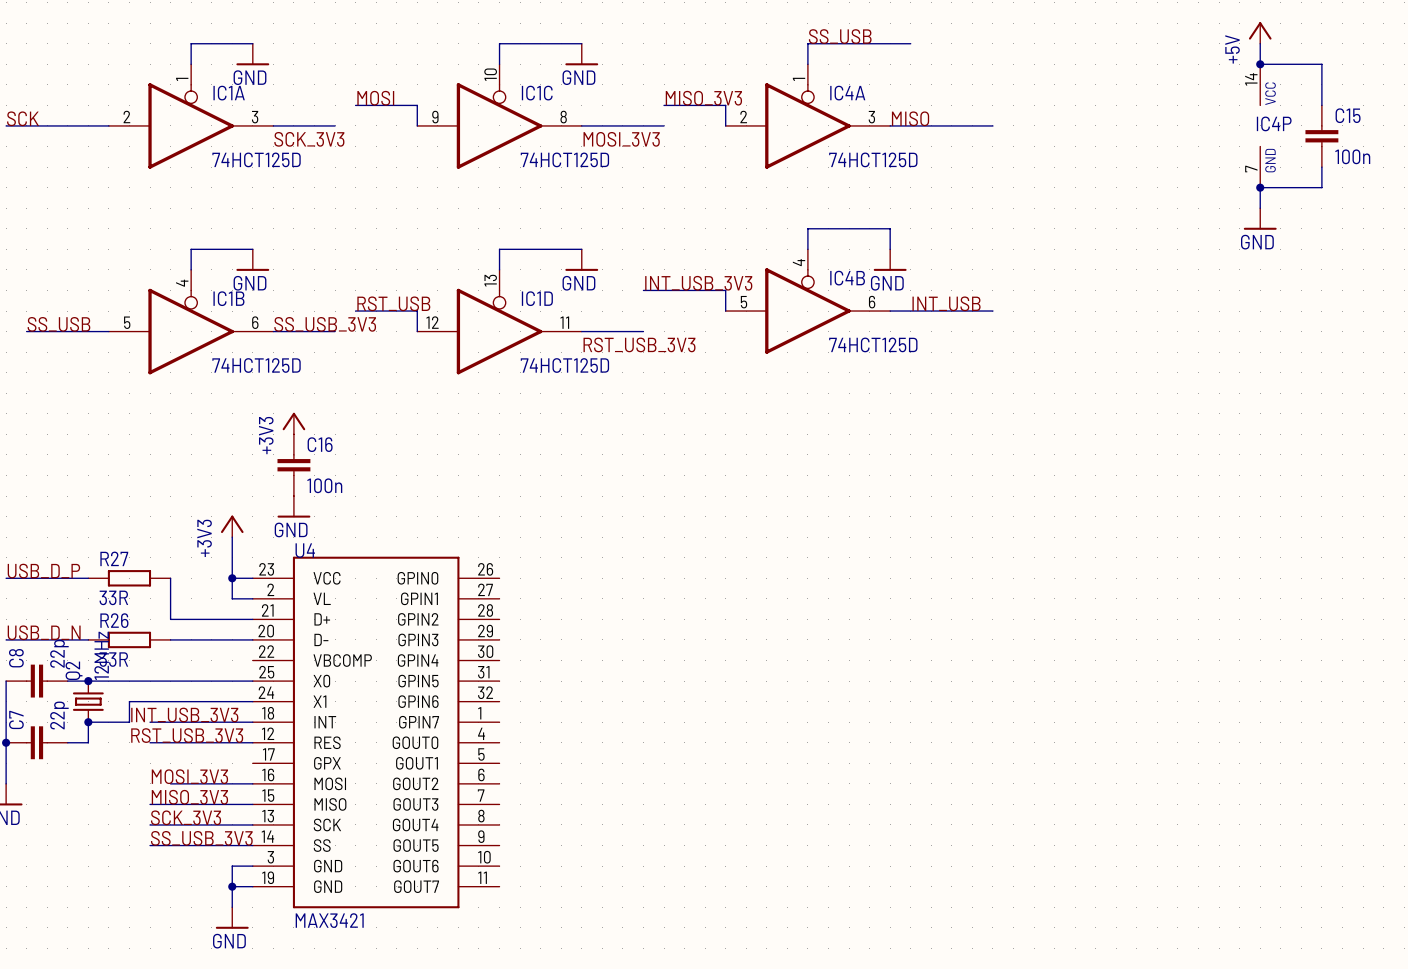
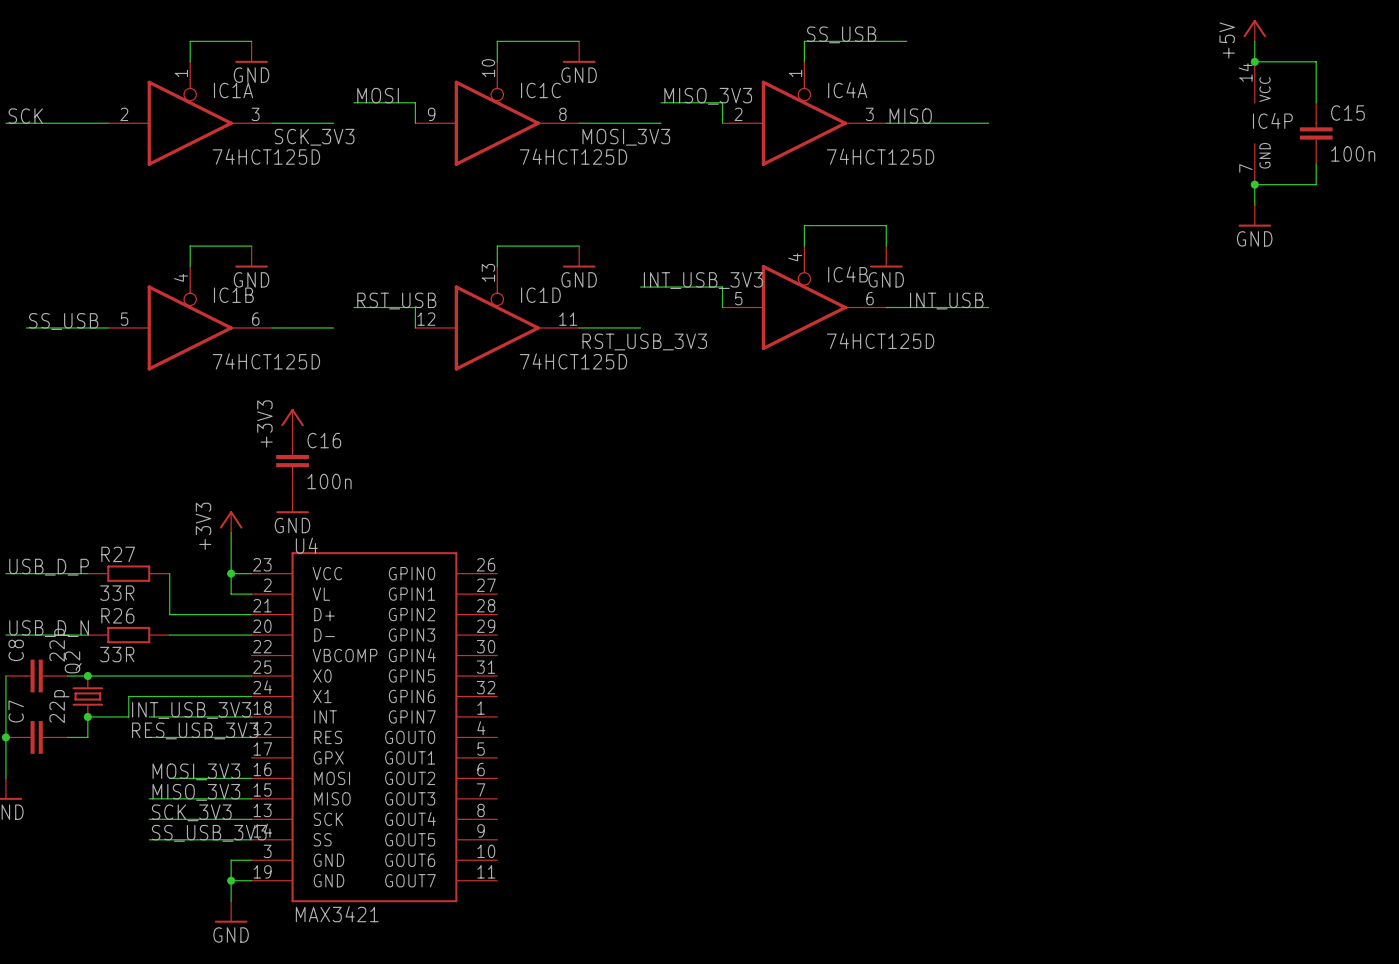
label: SS_USB_3V3 (325, 324) -> none
Q2 value: 12MHz (101, 655) -> none
label: RST_USB_3V3 (187, 735) -> RES_USB_3V3 (195, 730)

